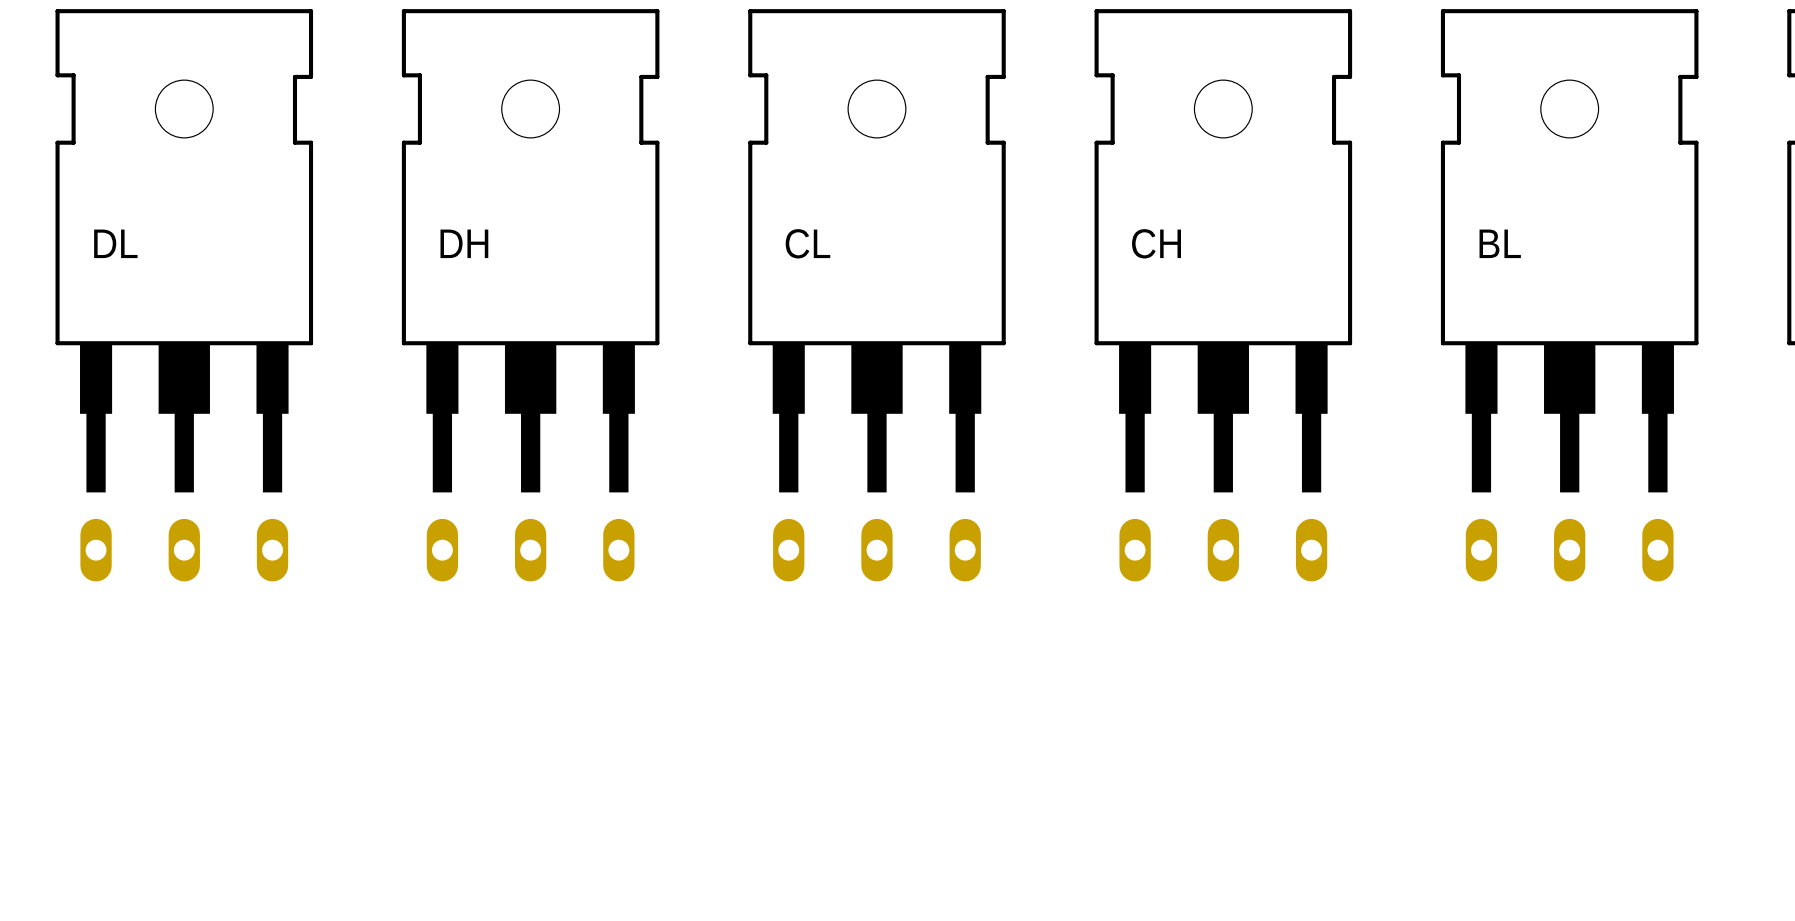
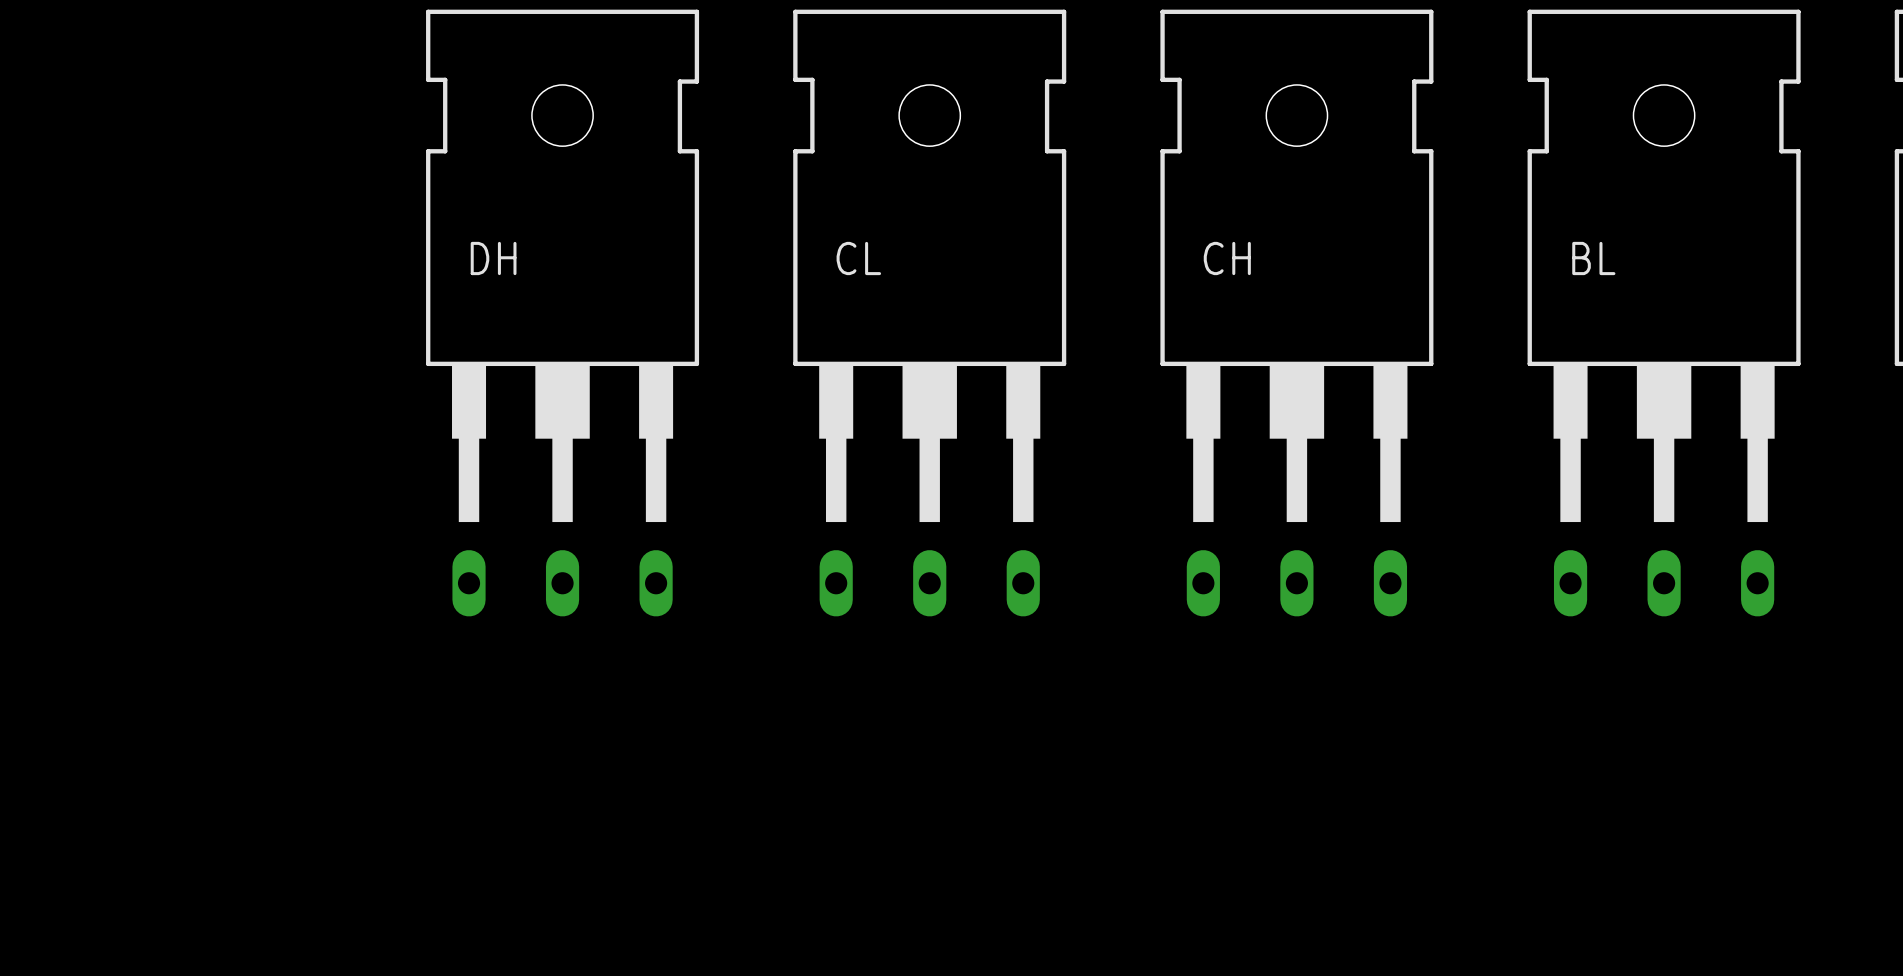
DL: (184, 295) -> none

